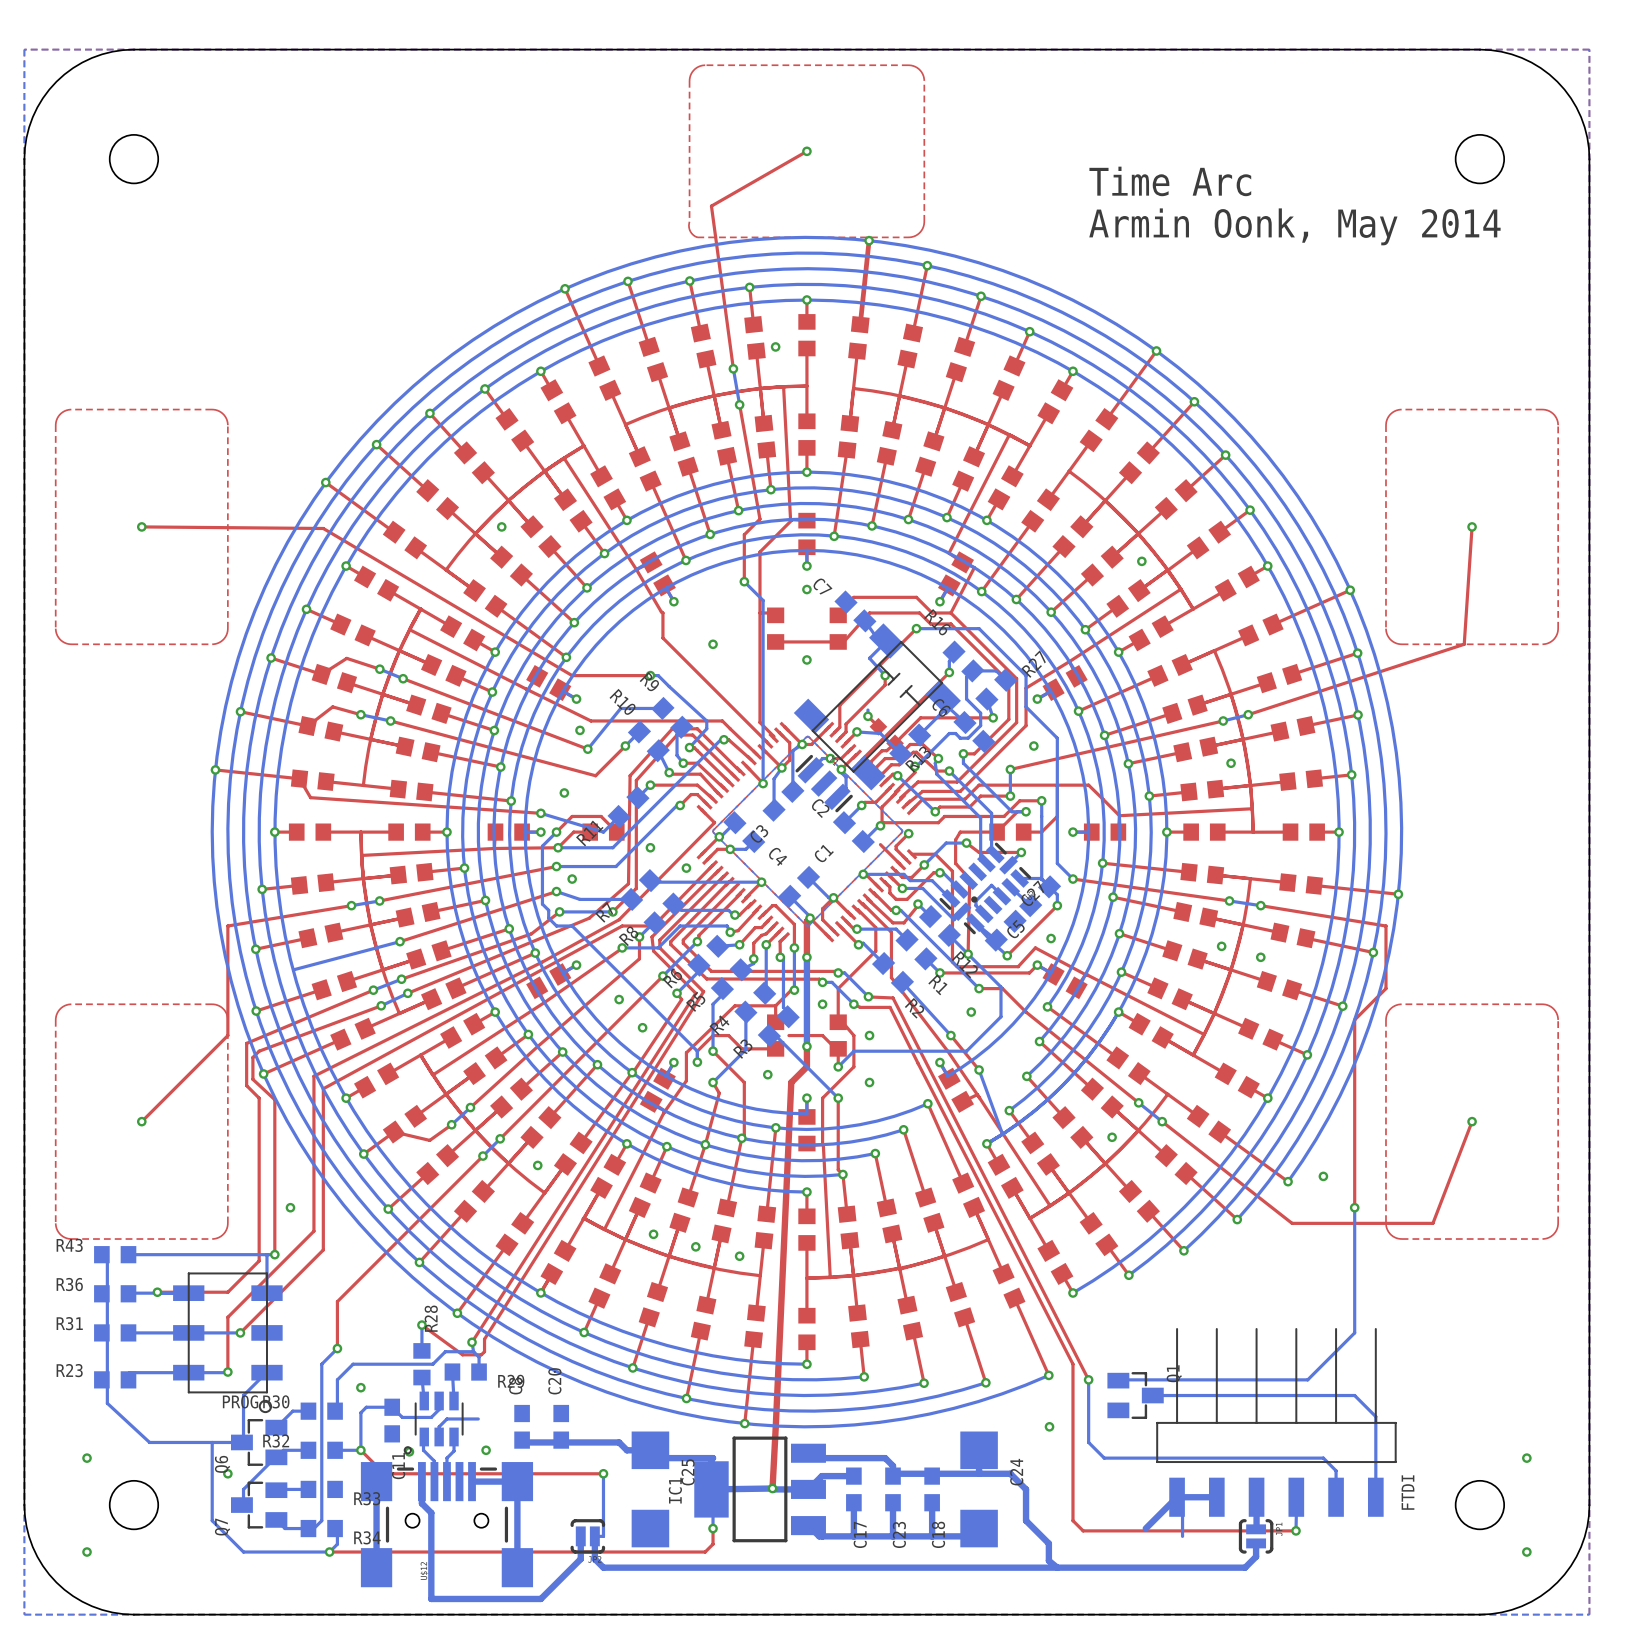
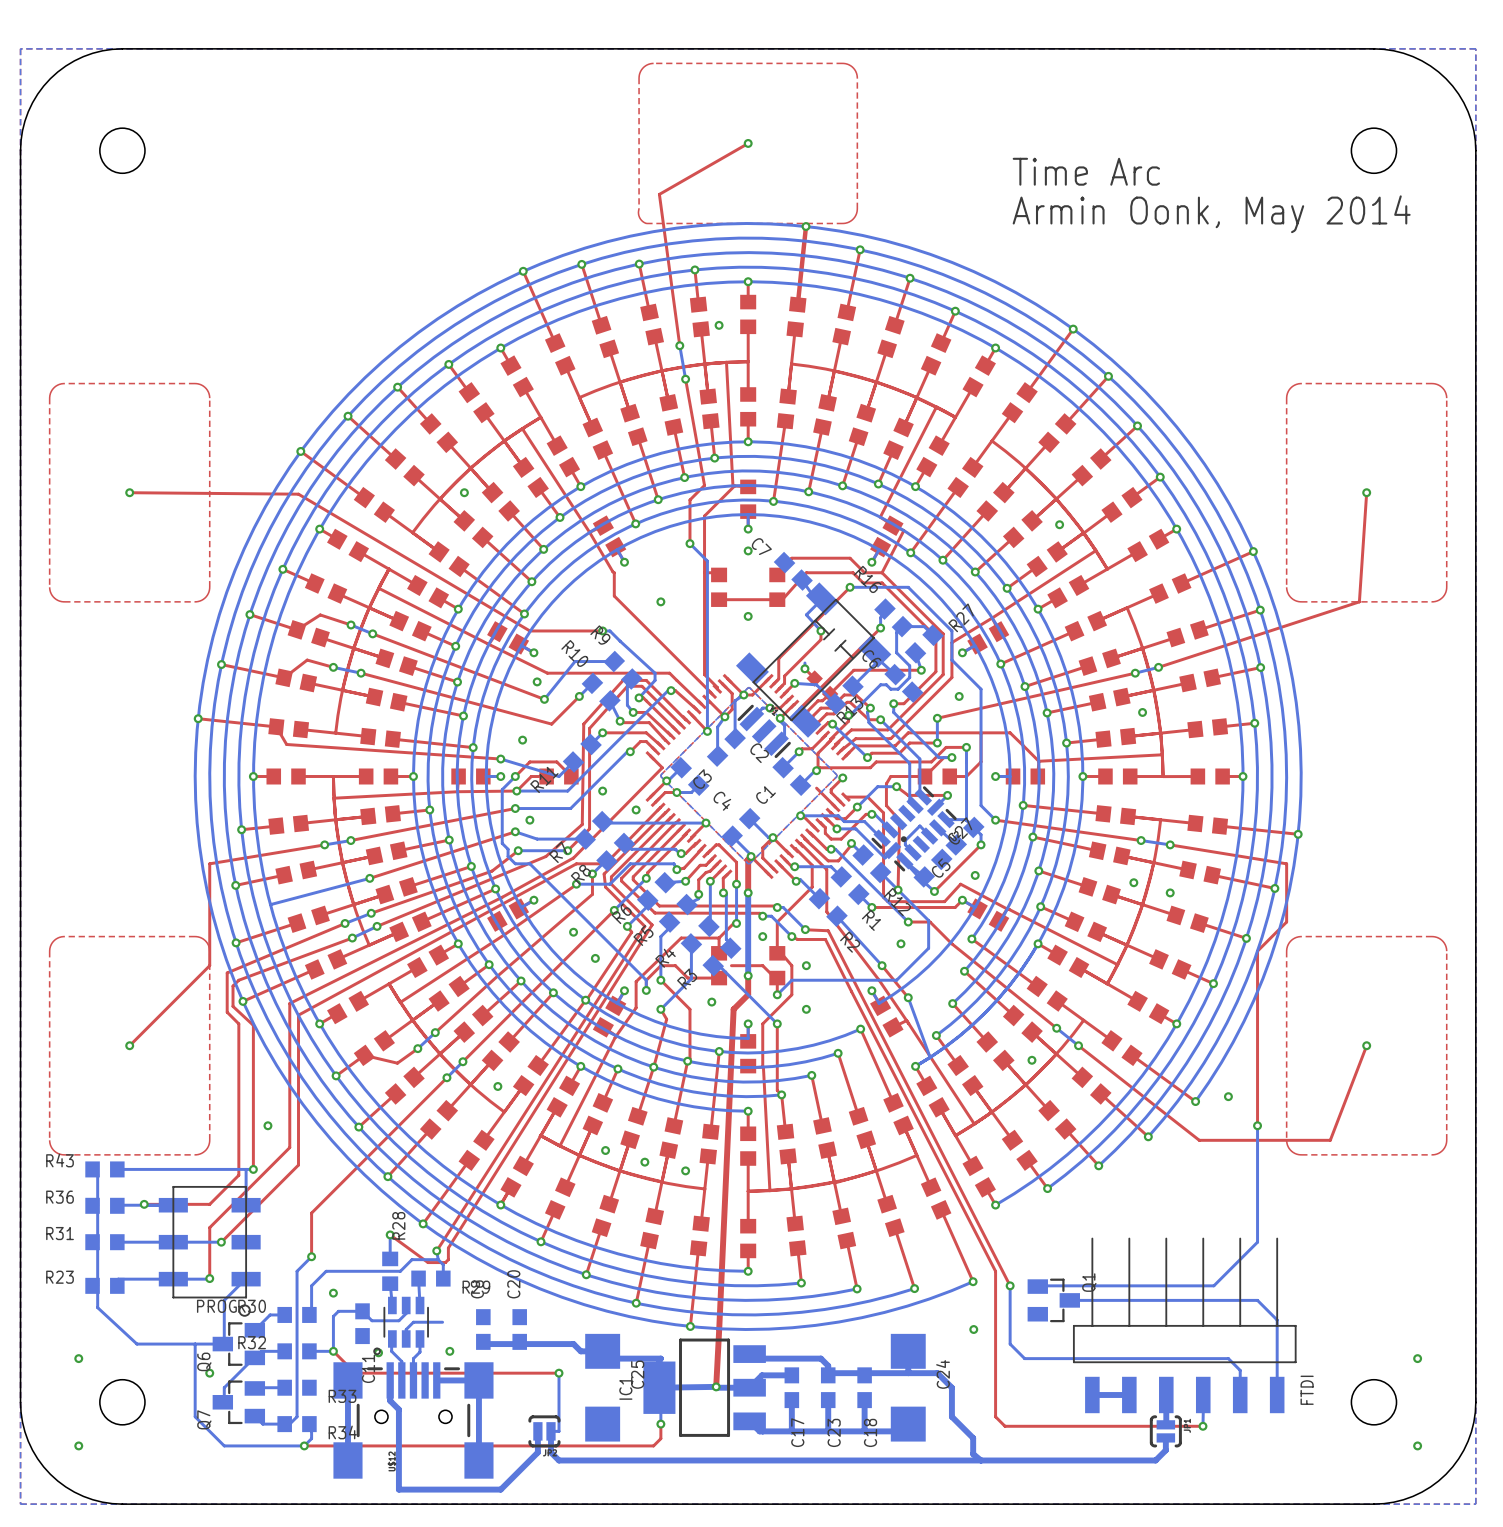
bottom track: (1177, 1497) (1145, 1528) -> none
bottom track: (1182, 1505) (1182, 1536) -> none

